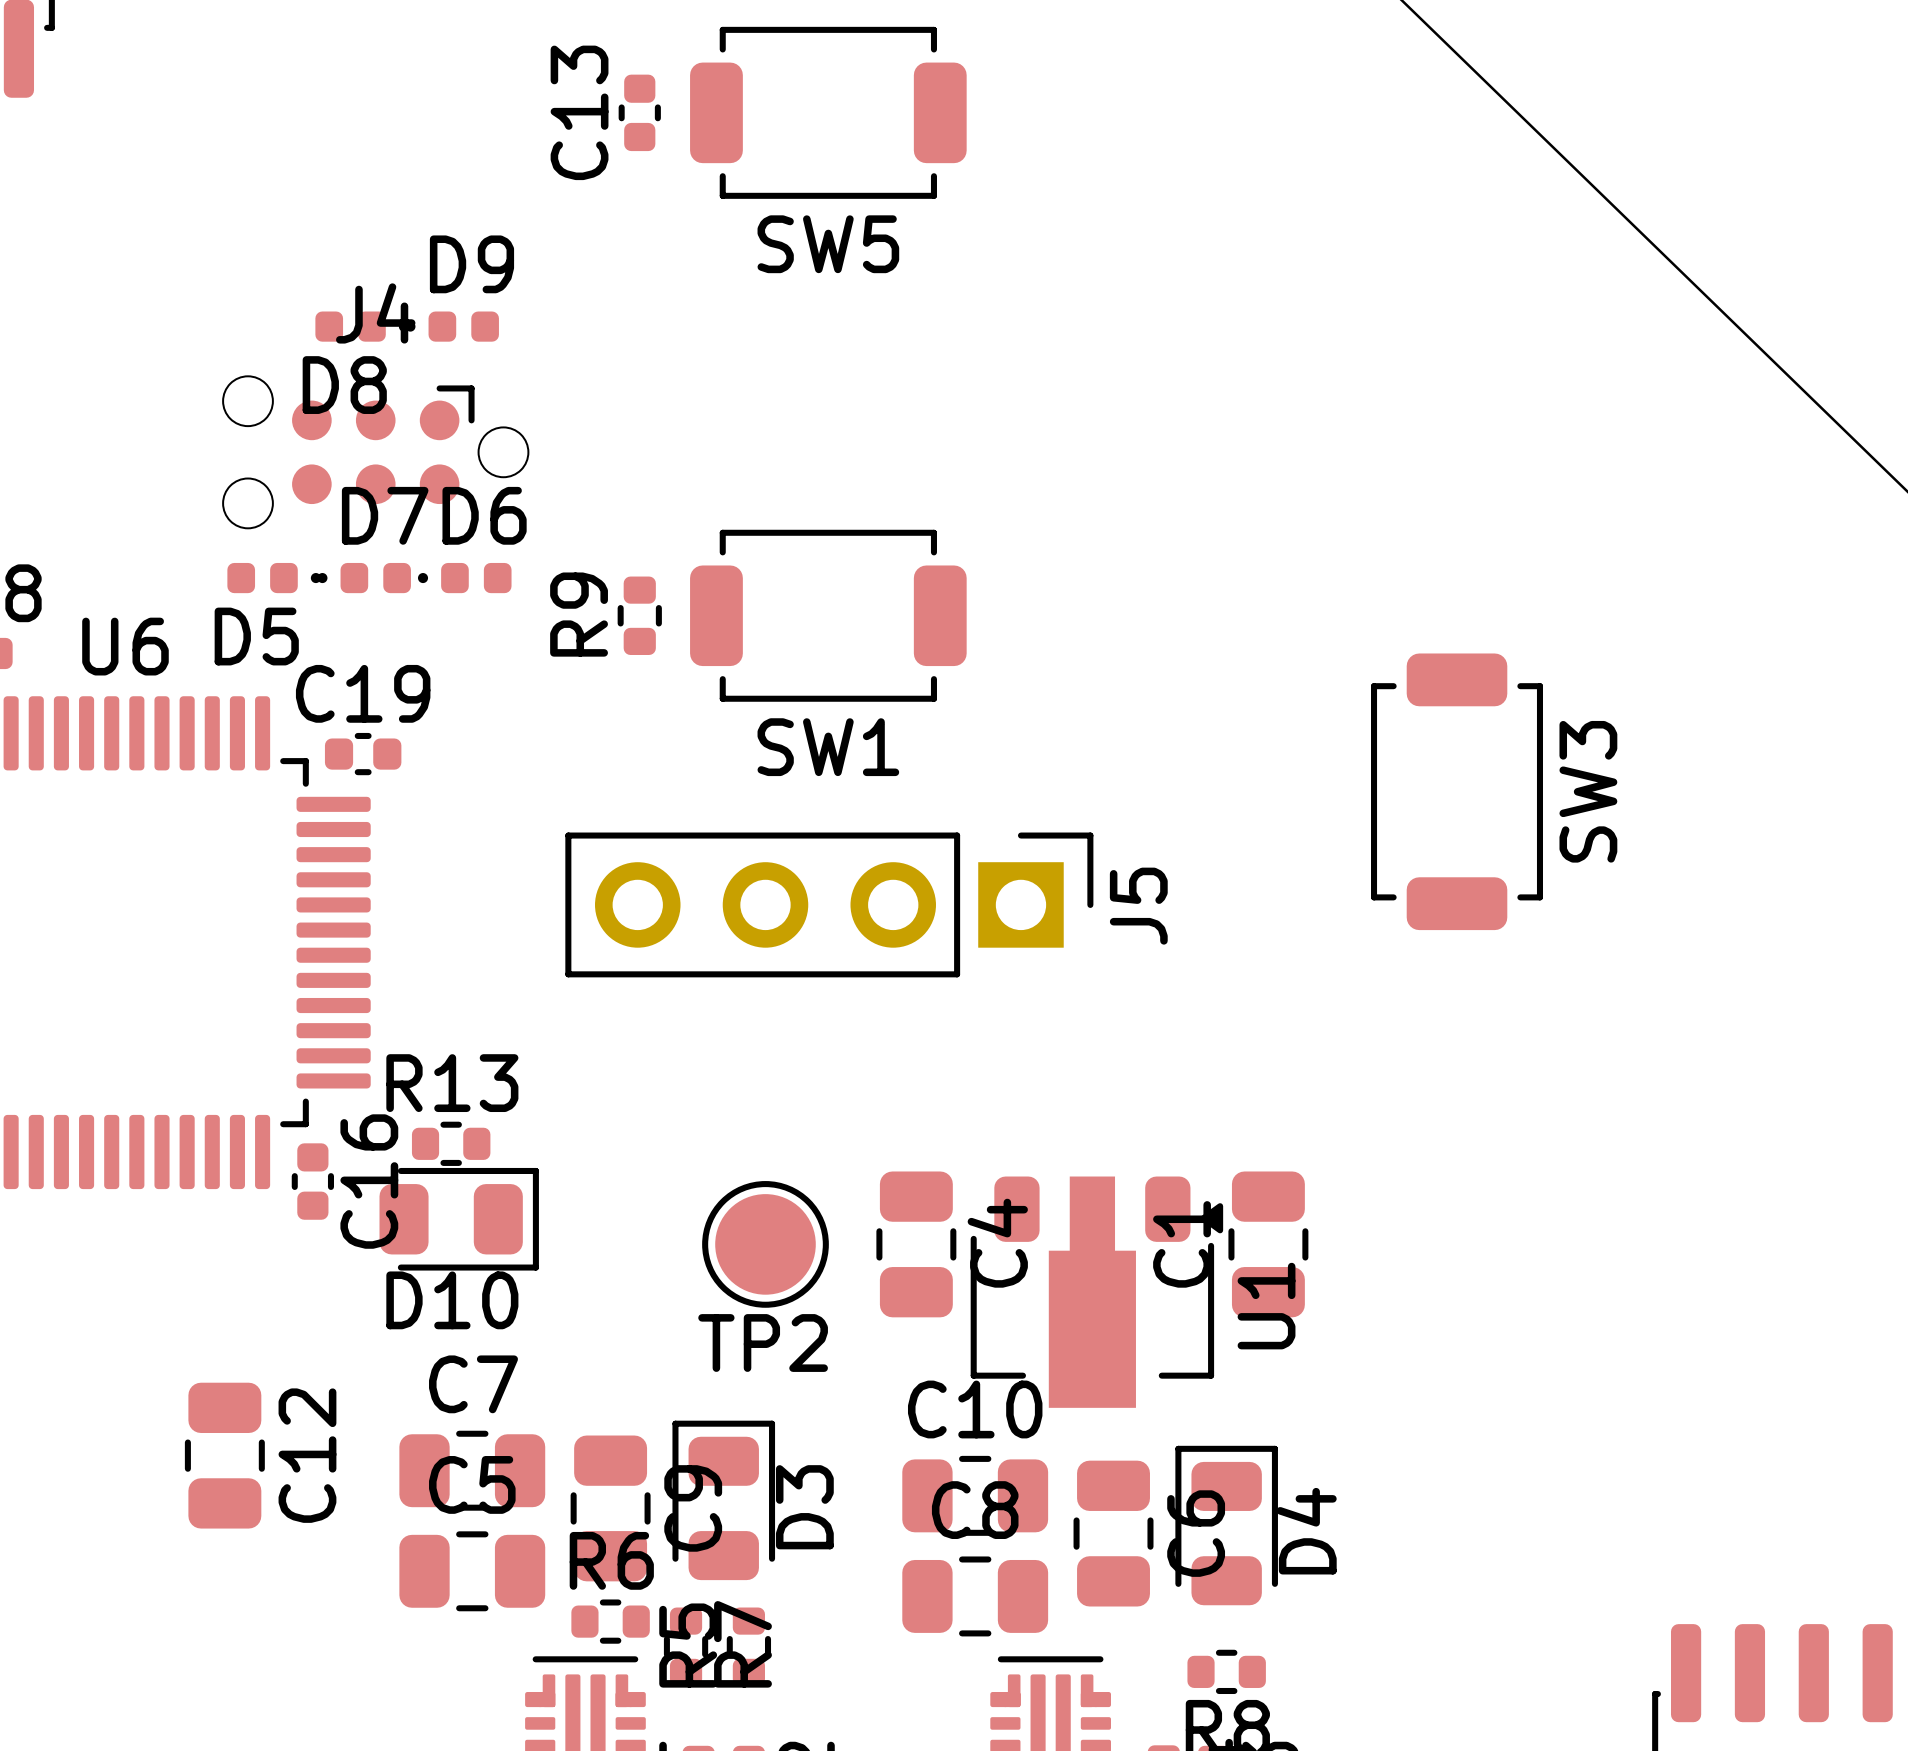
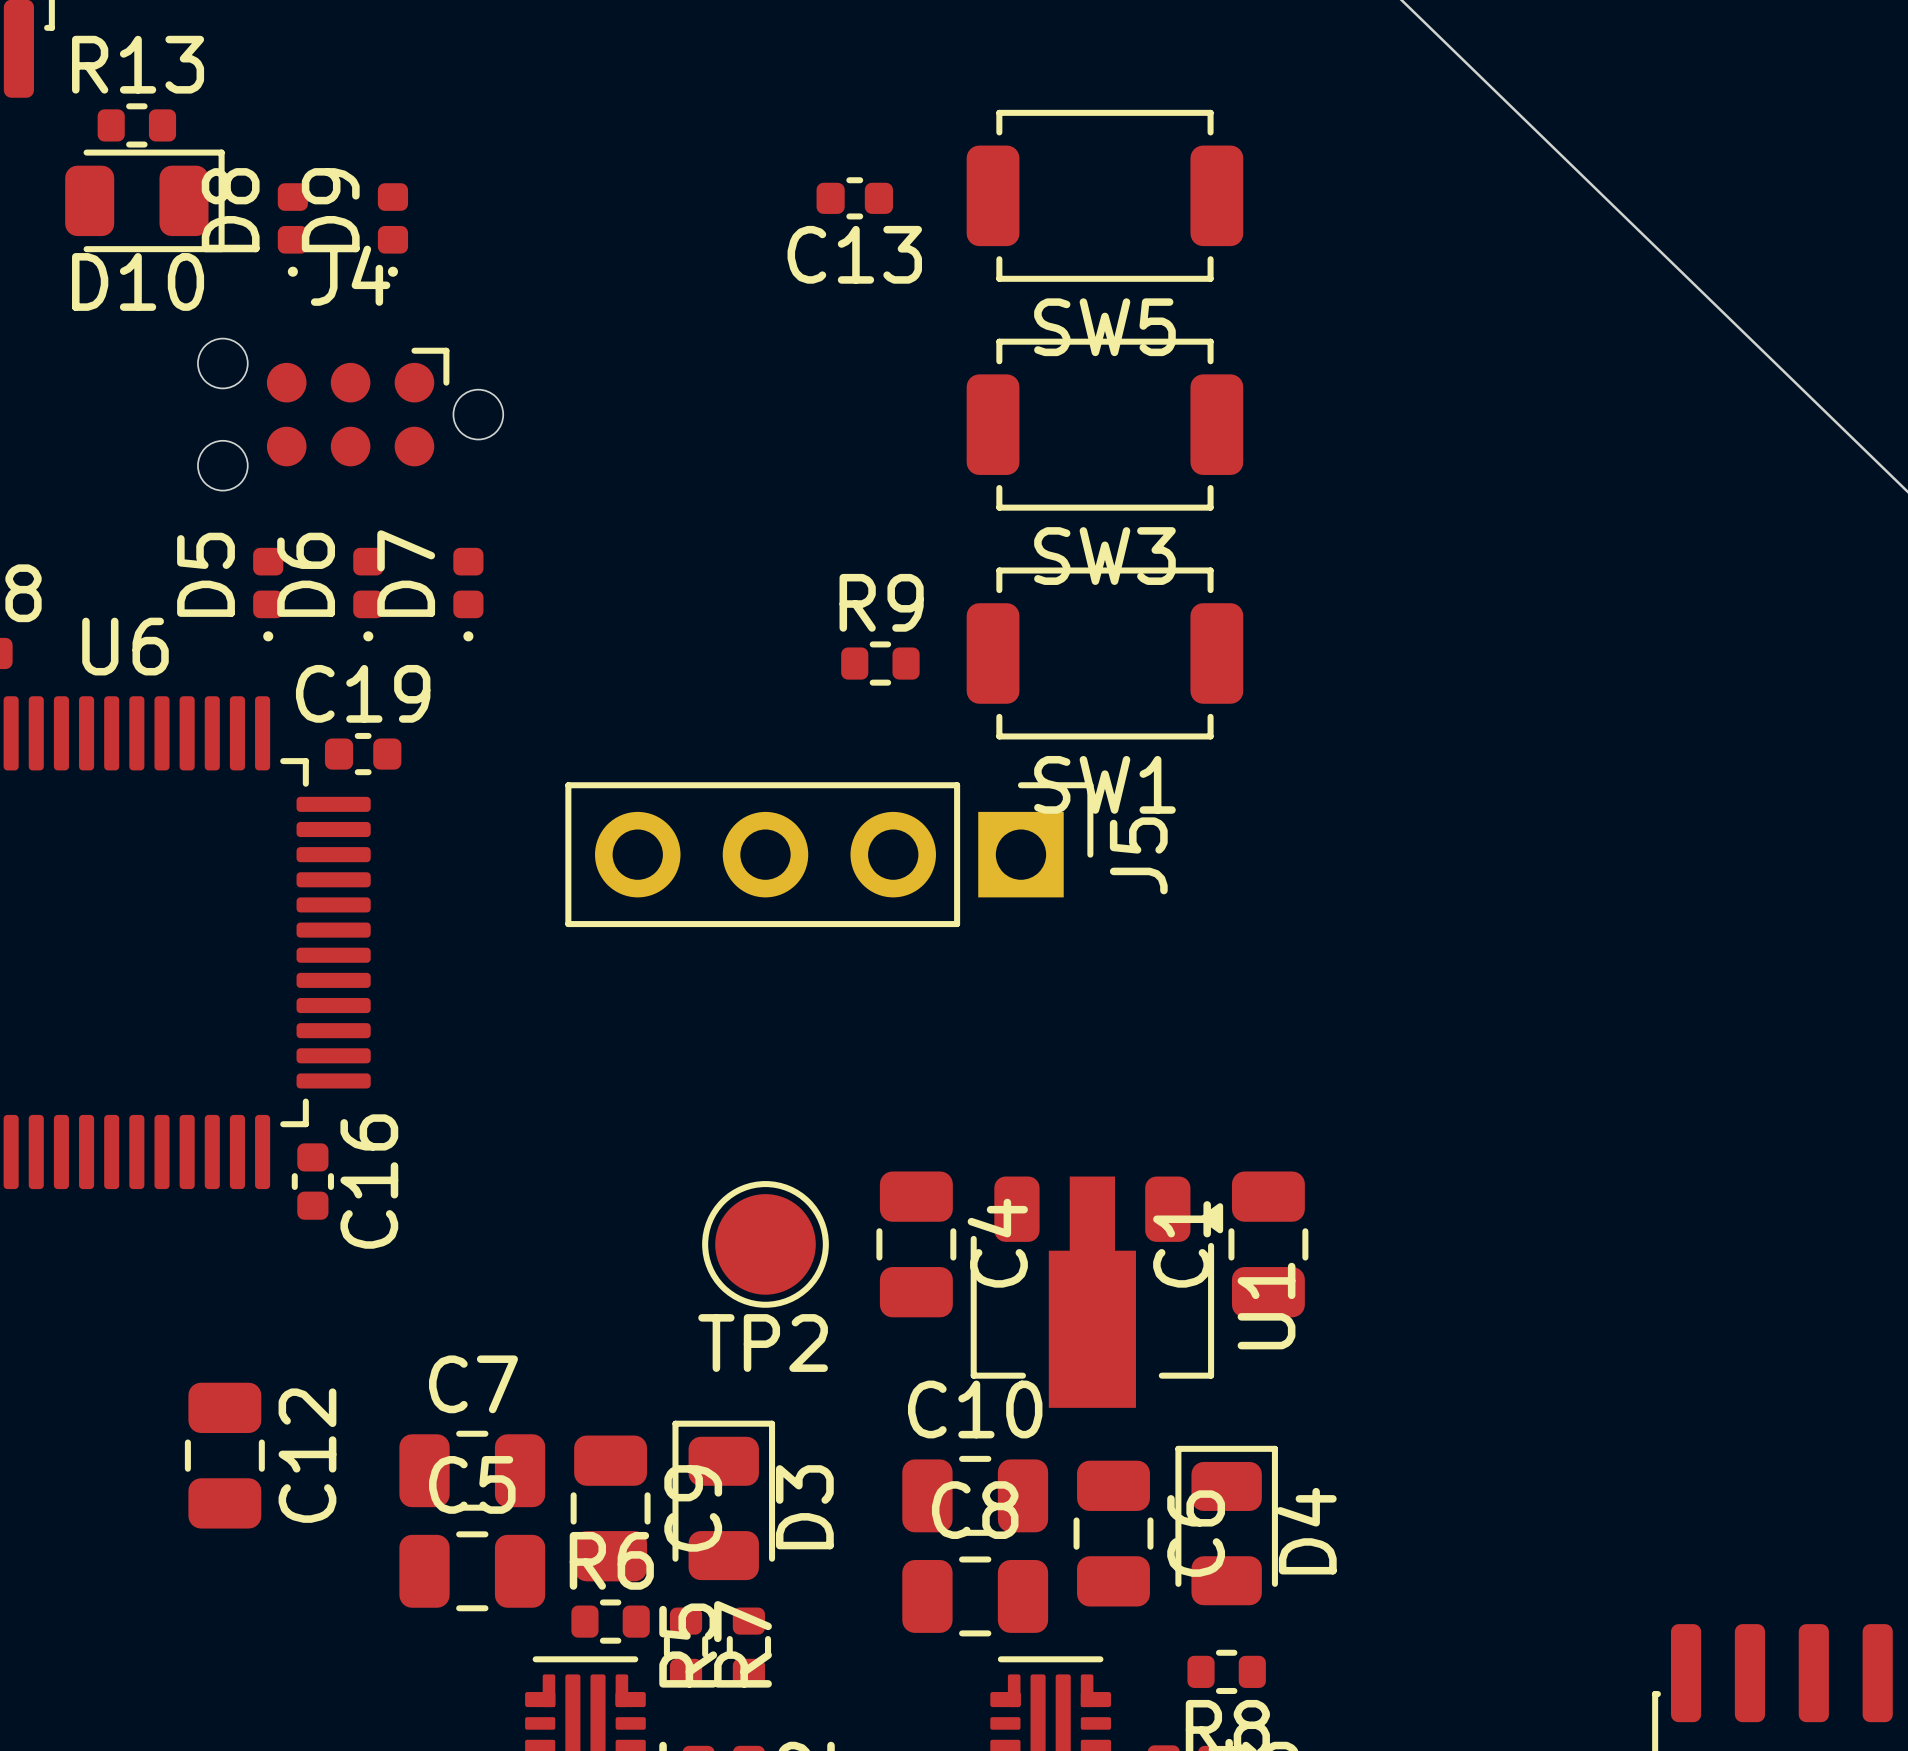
C13 rotation: 0° (639, 112) -> 90° clockwise (854, 198)
C13 position: (639, 112) -> (854, 198)
SW5 position: (828, 112) -> (1104, 195)
D8 rotation: 0° (362, 326) -> 90° clockwise (292, 229)
D8 position: (362, 326) -> (292, 229)
D9 rotation: 0° (452, 326) -> 90° counterclockwise (392, 229)
D9 position: (452, 326) -> (392, 229)
J4 position: (375, 452) -> (350, 414)
D5 rotation: 0° (274, 578) -> 90° clockwise (268, 594)
D7 rotation: 0° (364, 578) -> 90° counterclockwise (468, 594)
D7 position: (364, 578) -> (468, 594)
D6 rotation: 0° (464, 578) -> 90° counterclockwise (368, 594)
D6 position: (464, 578) -> (368, 594)
R9 rotation: 0° (639, 615) -> 90° clockwise (880, 663)
R9 position: (639, 615) -> (880, 663)
SW1 position: (828, 615) -> (1104, 653)
SW3 rotation: 0° (1457, 791) -> 90° clockwise (1104, 424)
SW3 position: (1457, 791) -> (1104, 424)
J5 position: (829, 904) -> (829, 854)
R13 position: (451, 1143) -> (136, 125)
D10 position: (459, 1219) -> (144, 200)

